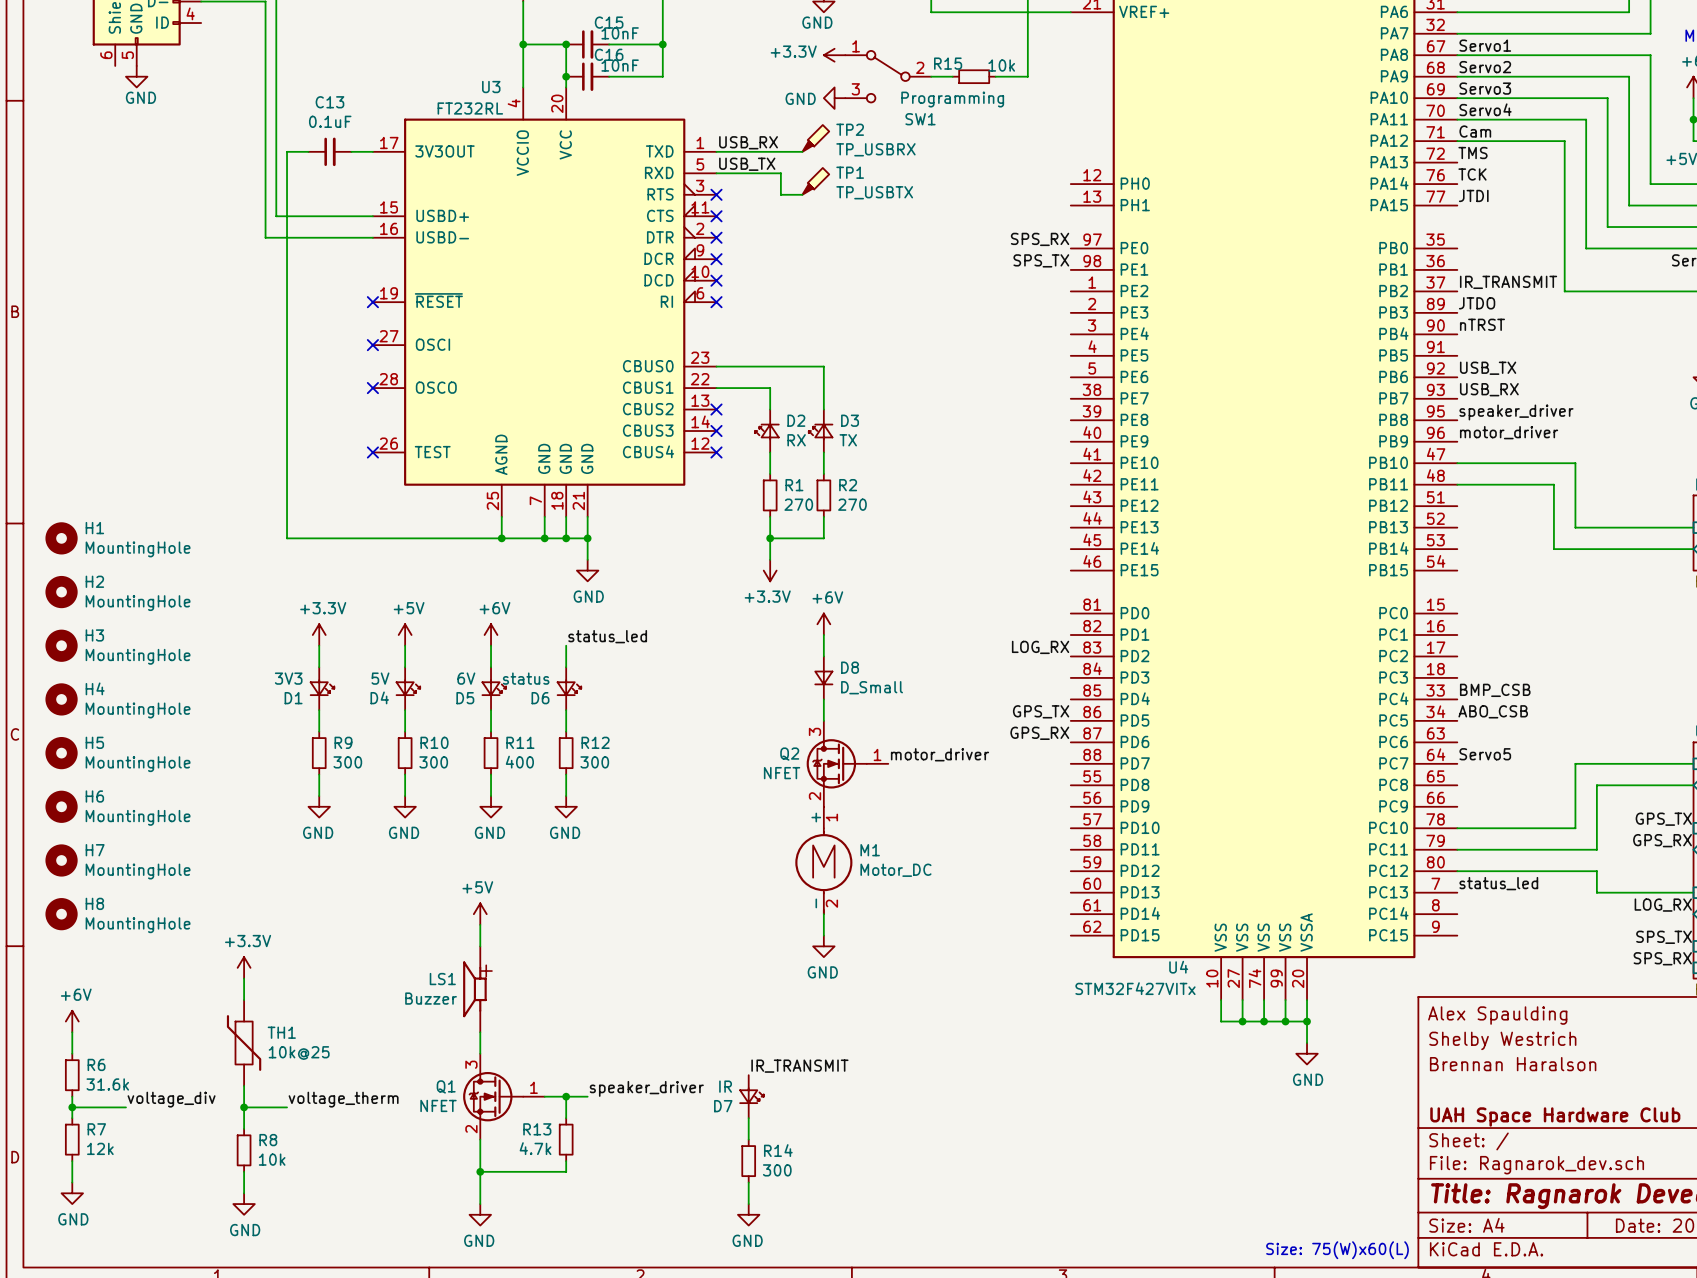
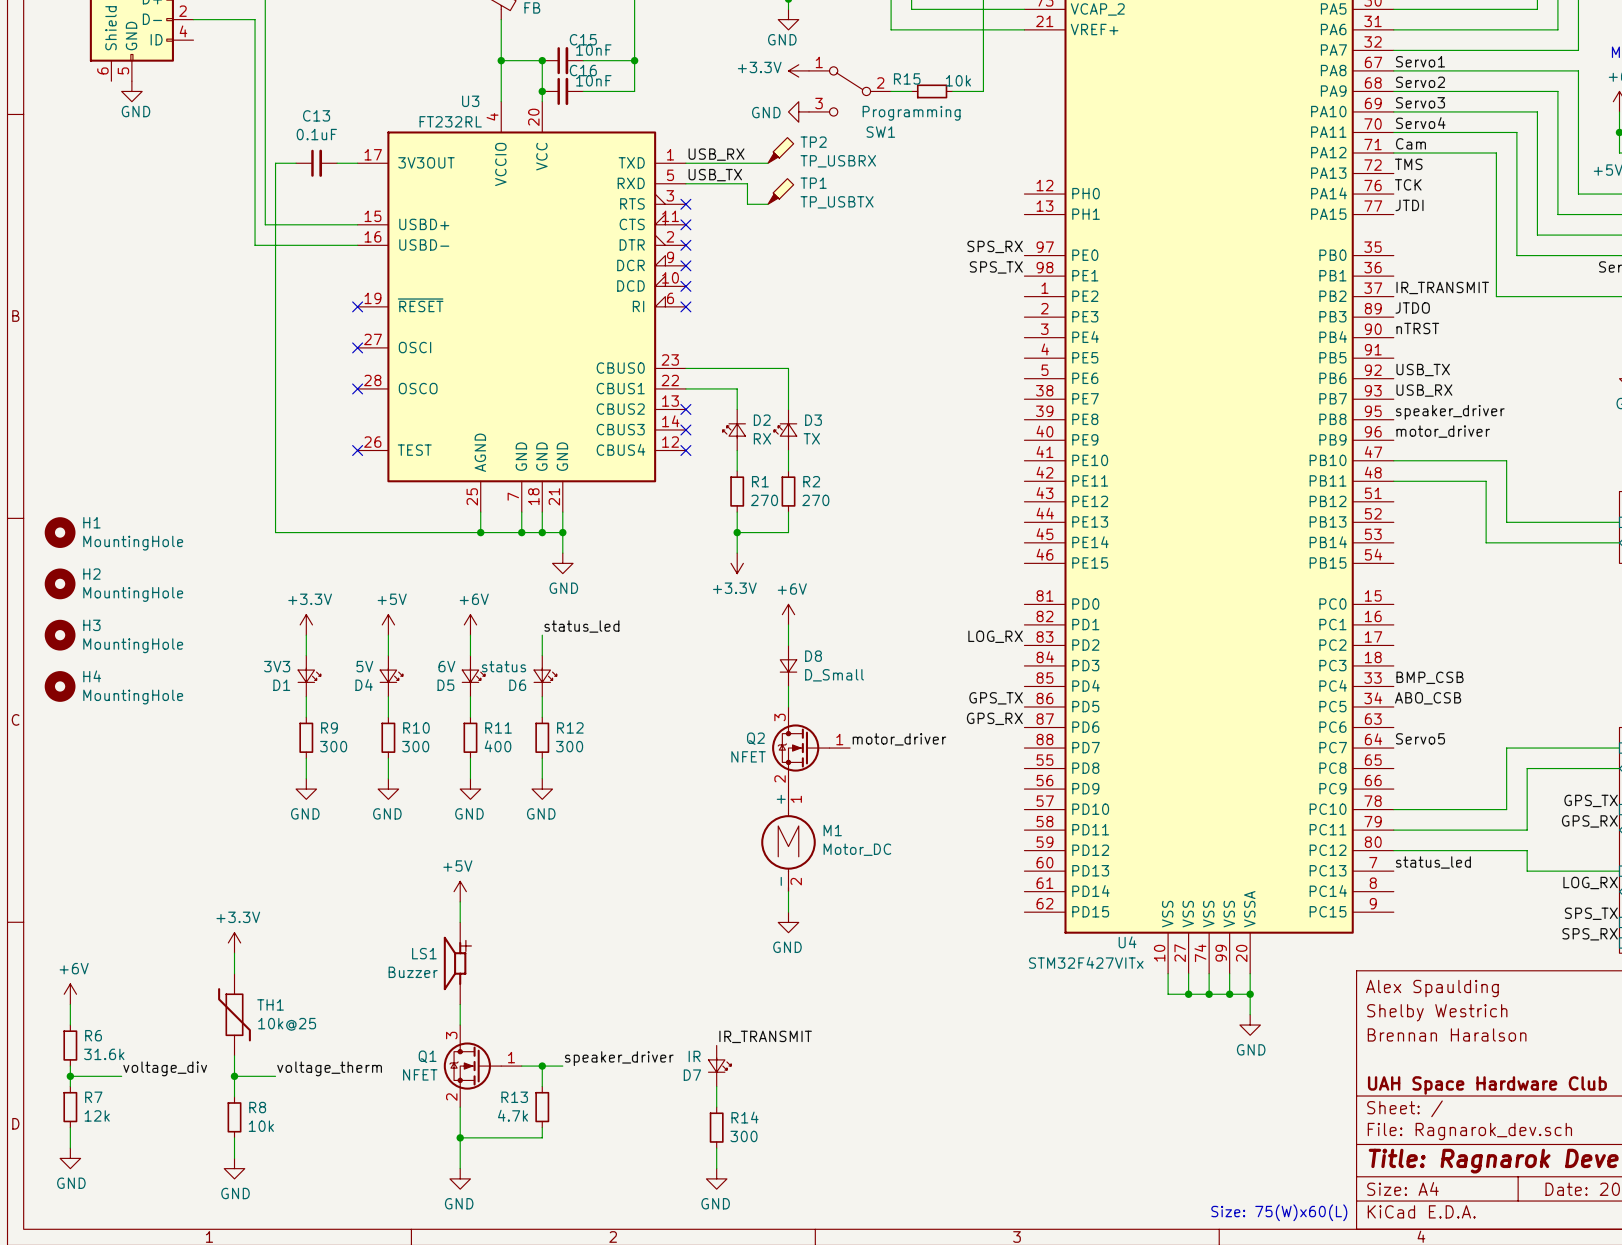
H5: MountingHole (61, 753) -> none
H6: MountingHole (61, 806) -> none
H7: MountingHole (61, 860) -> none
H8: MountingHole (61, 914) -> none

